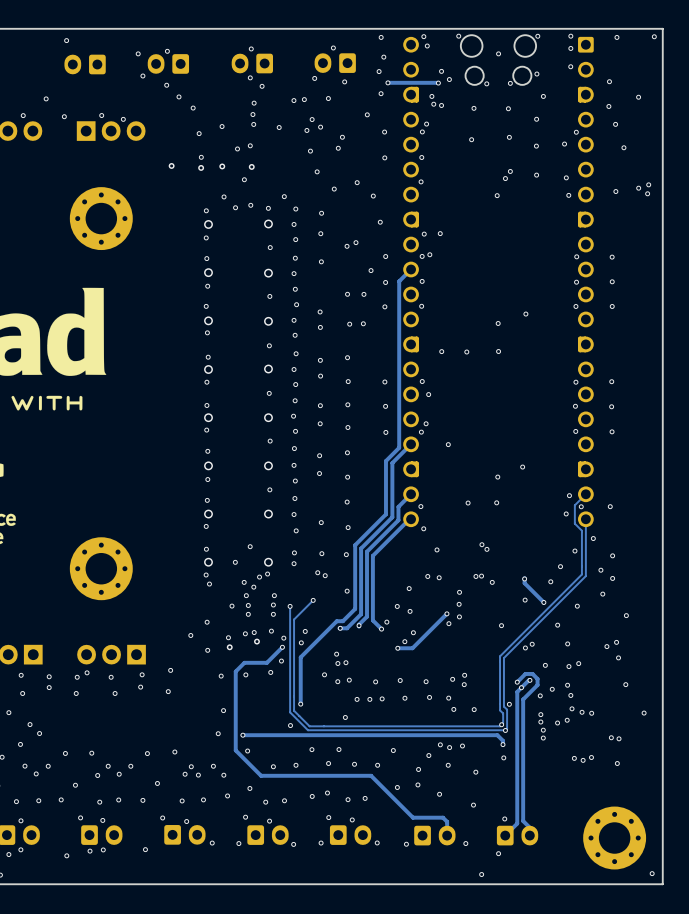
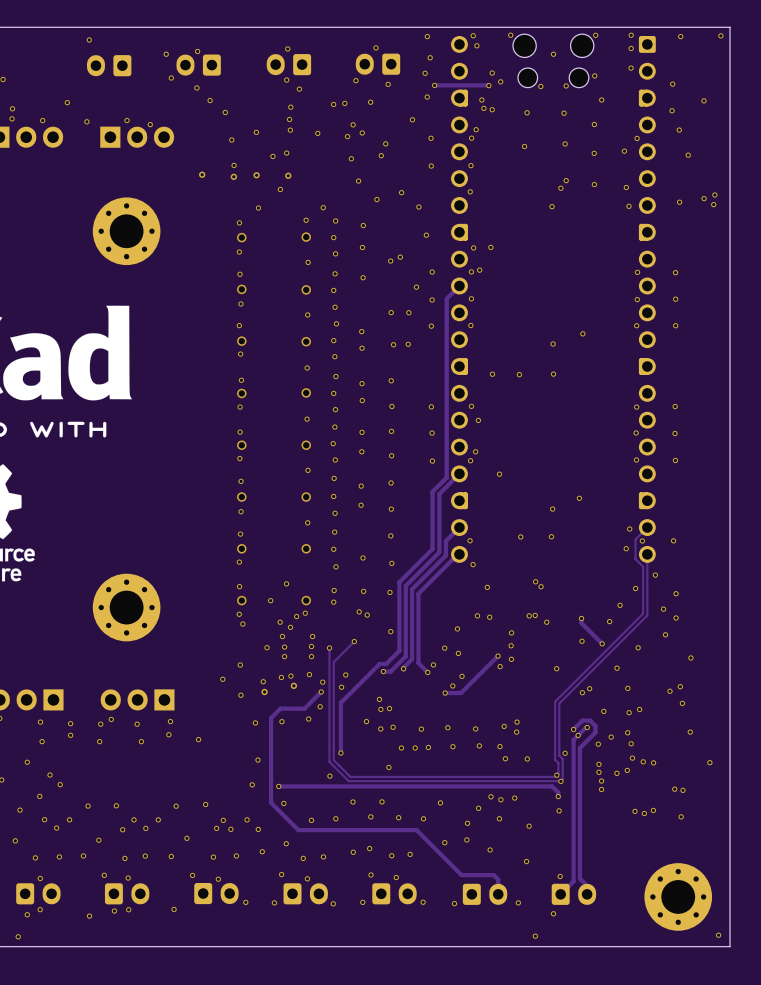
via: (250, 205) -> none
via: (235, 207) -> none
via: (170, 670) -> none

